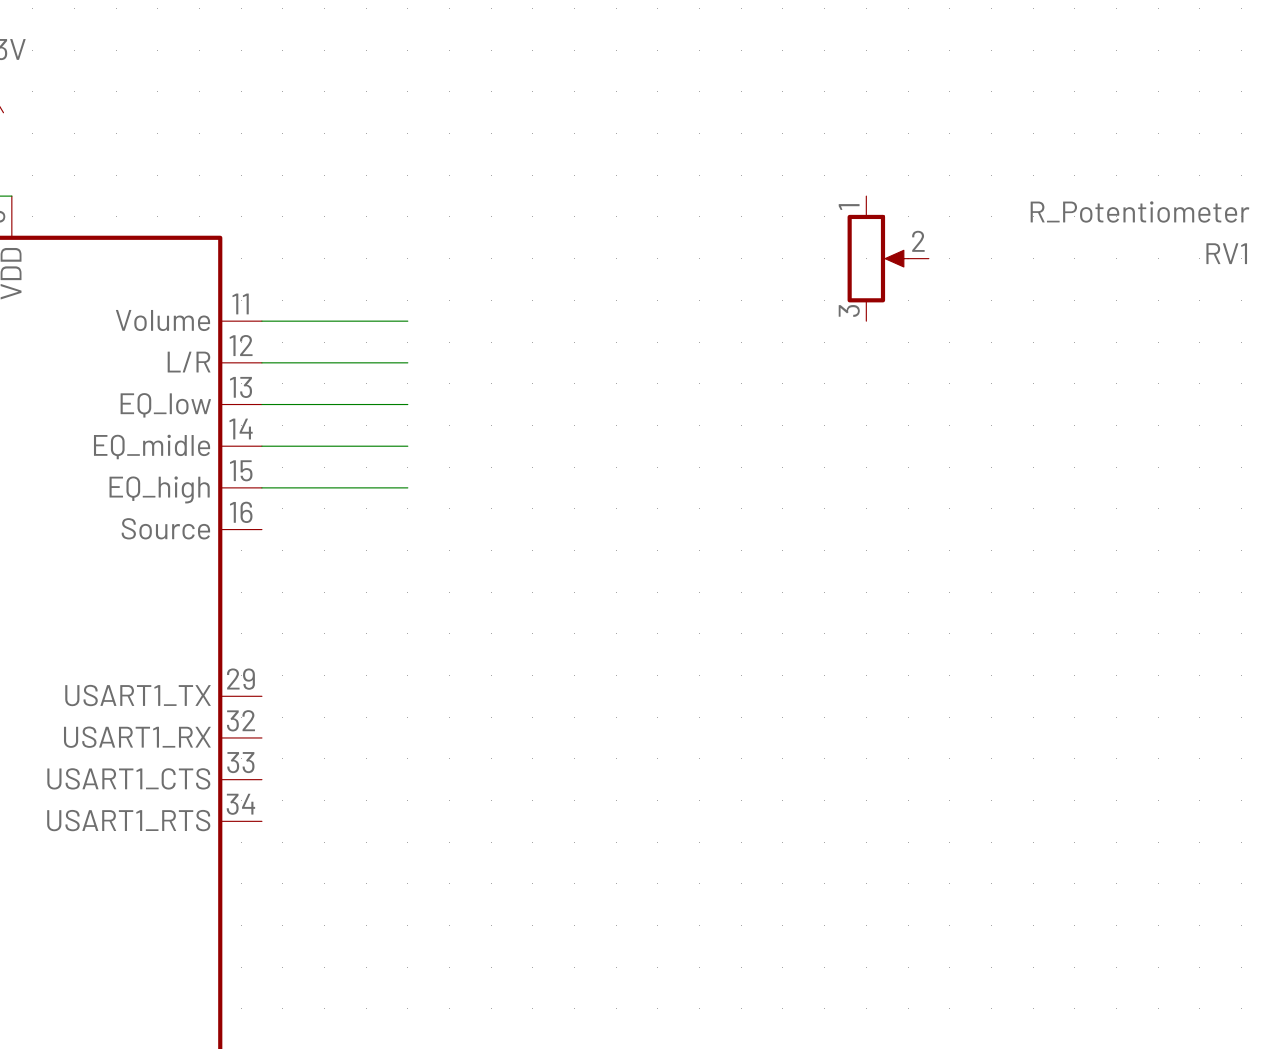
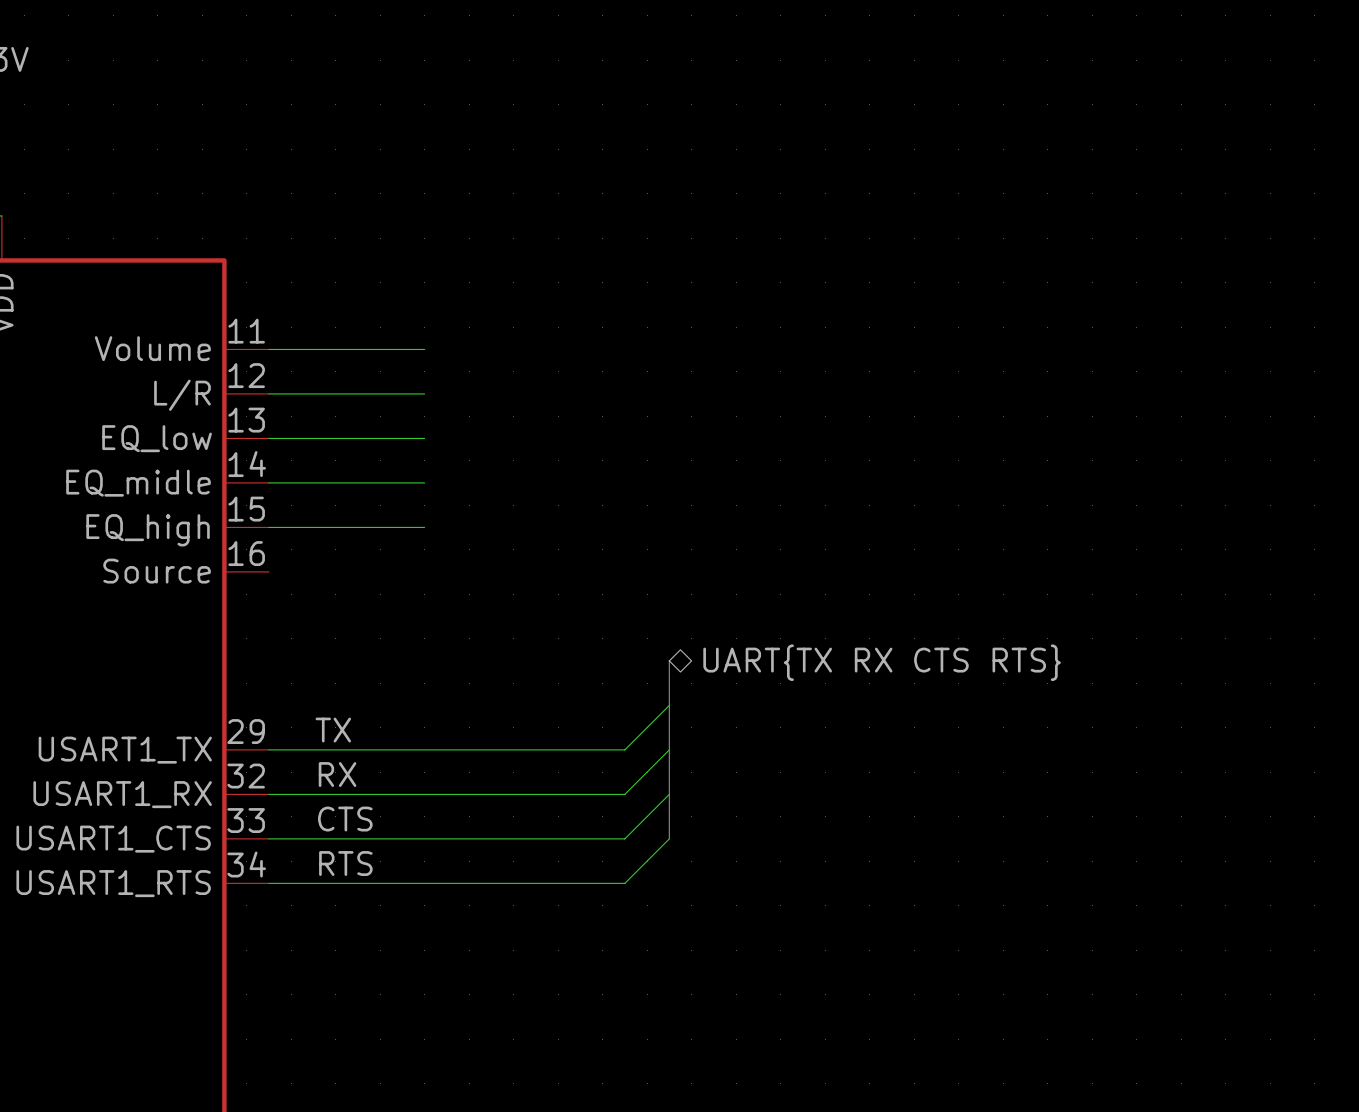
RV1: R_Potentiometer (888, 258) -> none
bus: none -> (669, 660) (669, 838)
hierarchical label: none -> UART{TX RX CTS RTS} (882, 662)
wire: none -> (669, 705) (624, 749) (268, 749)
label: none -> TX (333, 730)
wire: none -> (669, 749) (624, 794) (268, 794)
label: none -> RX (337, 774)
wire: none -> (669, 794) (624, 838) (268, 838)
label: none -> CTS (345, 819)
wire: none -> (669, 838) (624, 883) (268, 883)
label: none -> RTS (345, 863)

